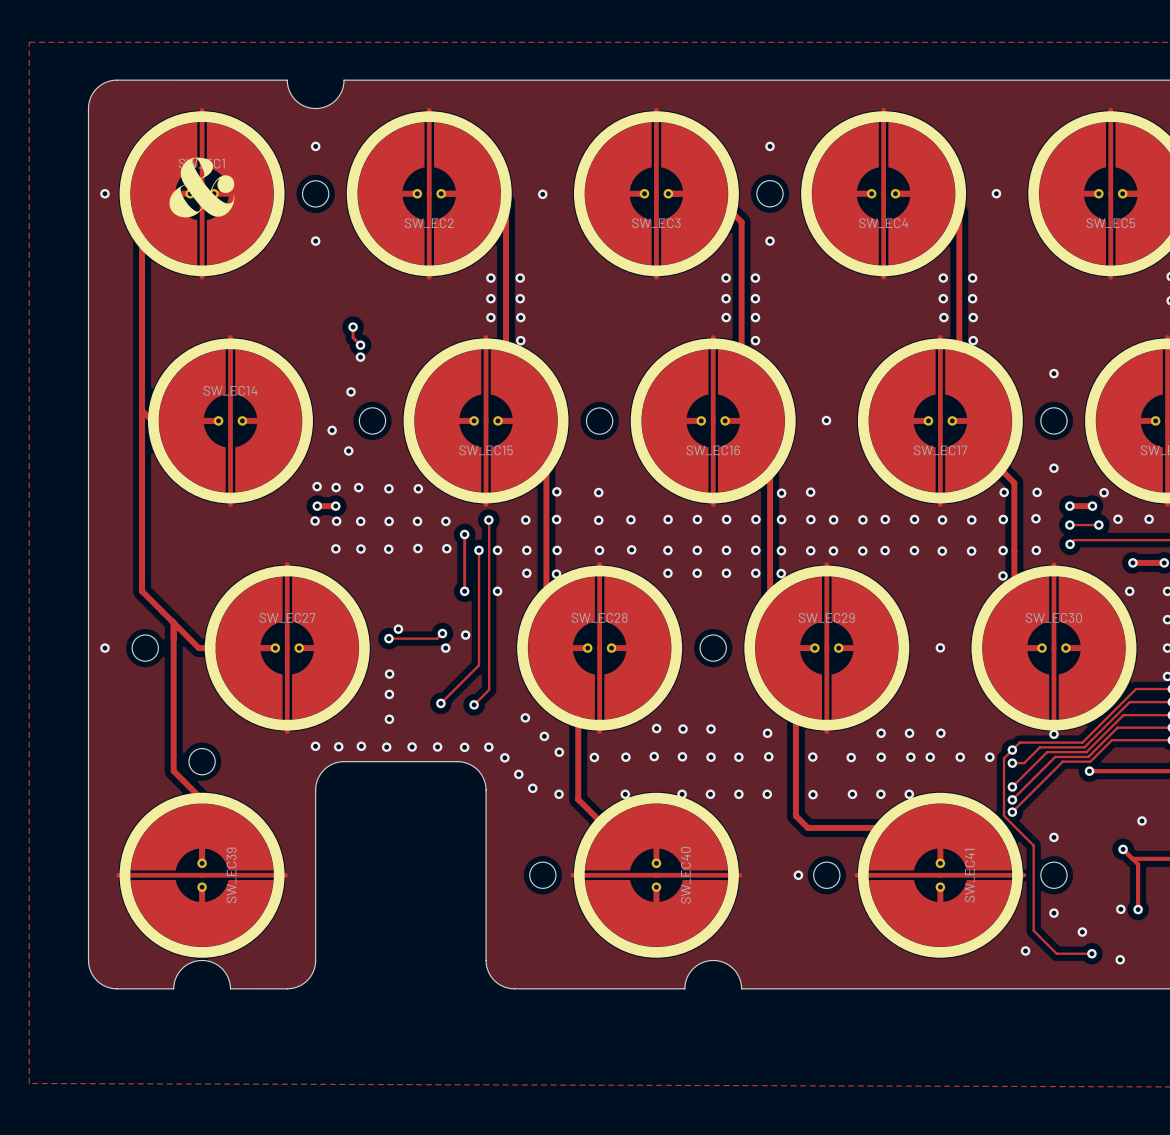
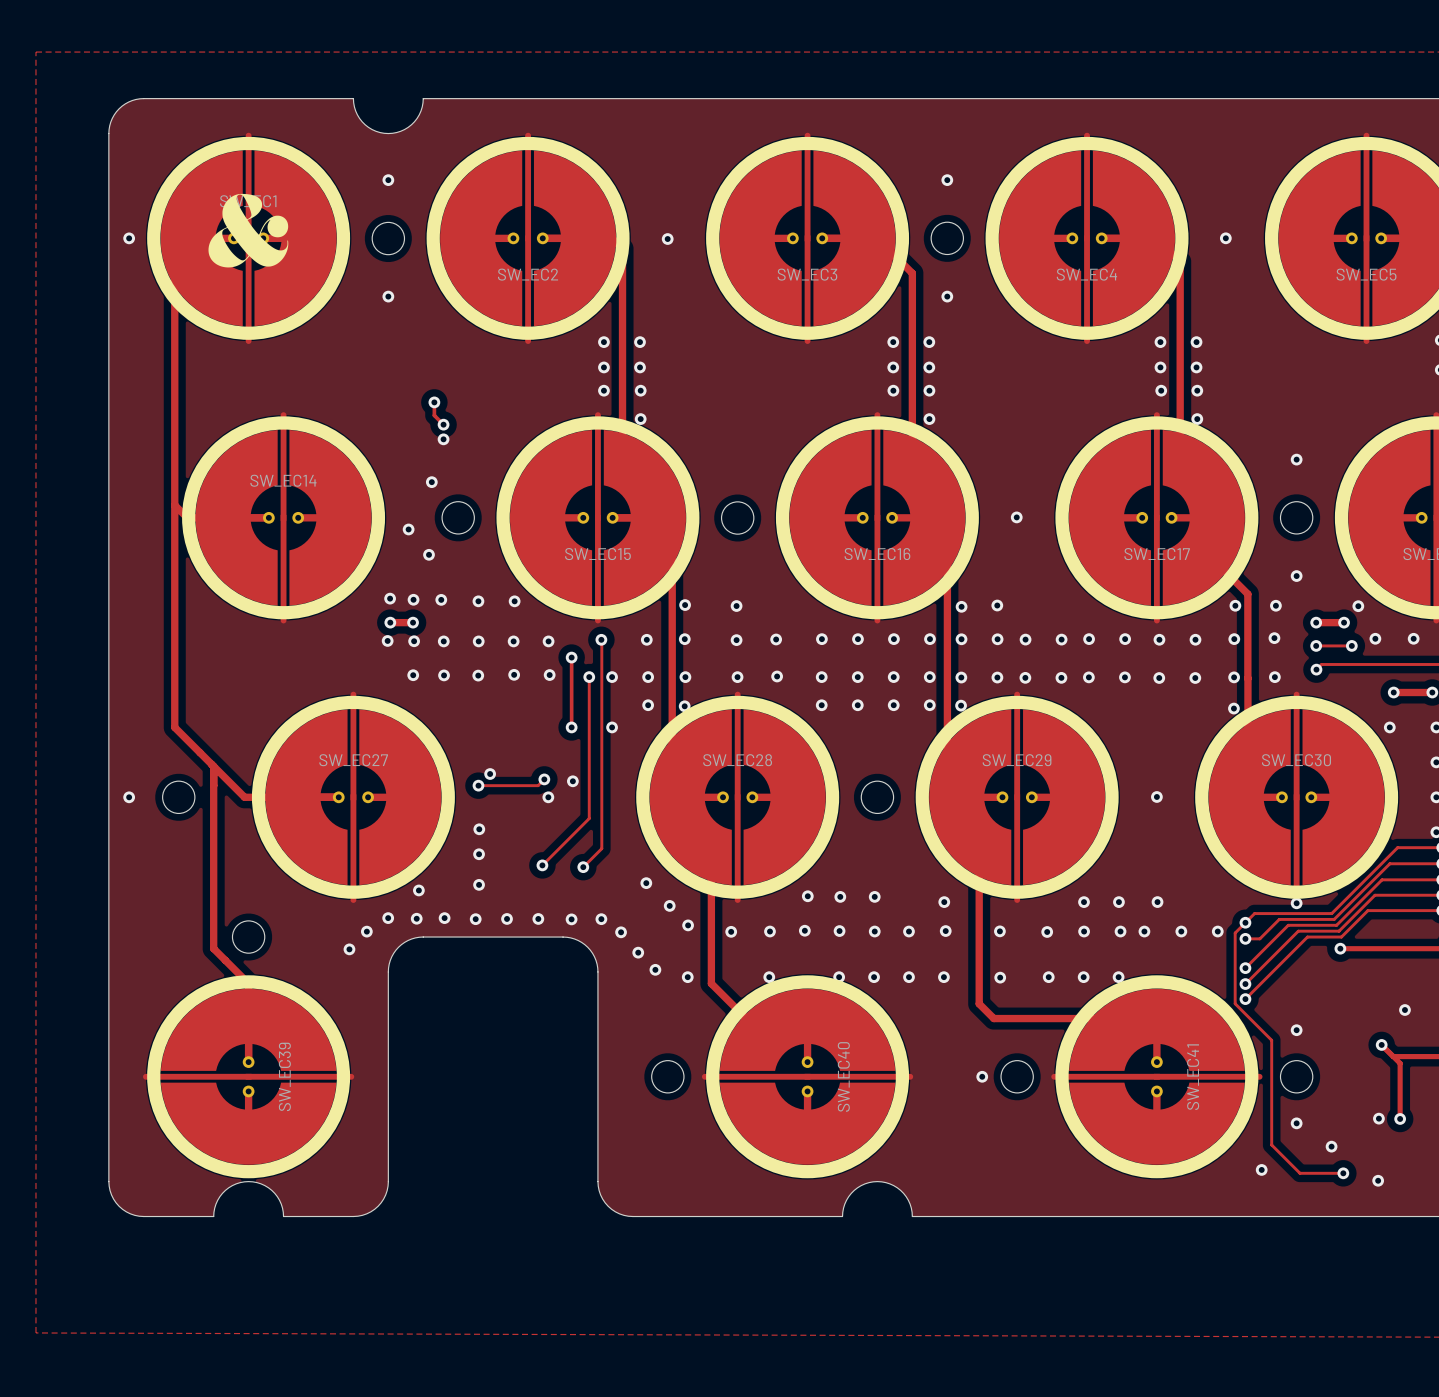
via: none -> (418, 890)
via: none -> (366, 931)
via: none -> (349, 949)

